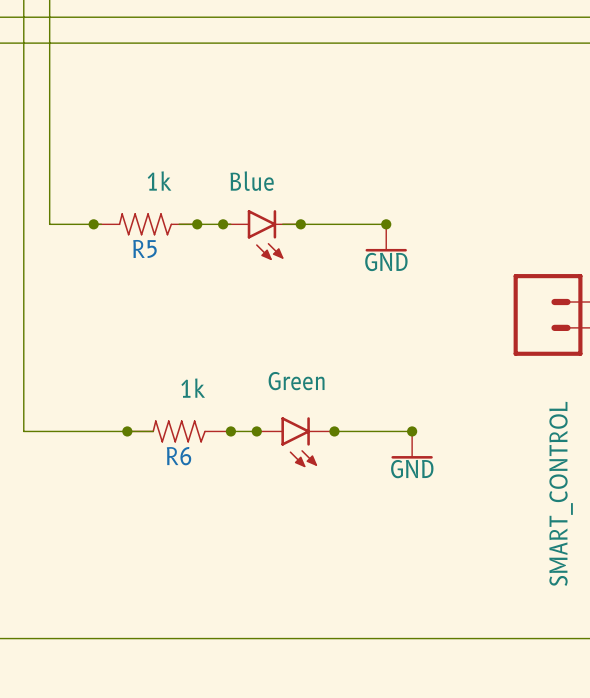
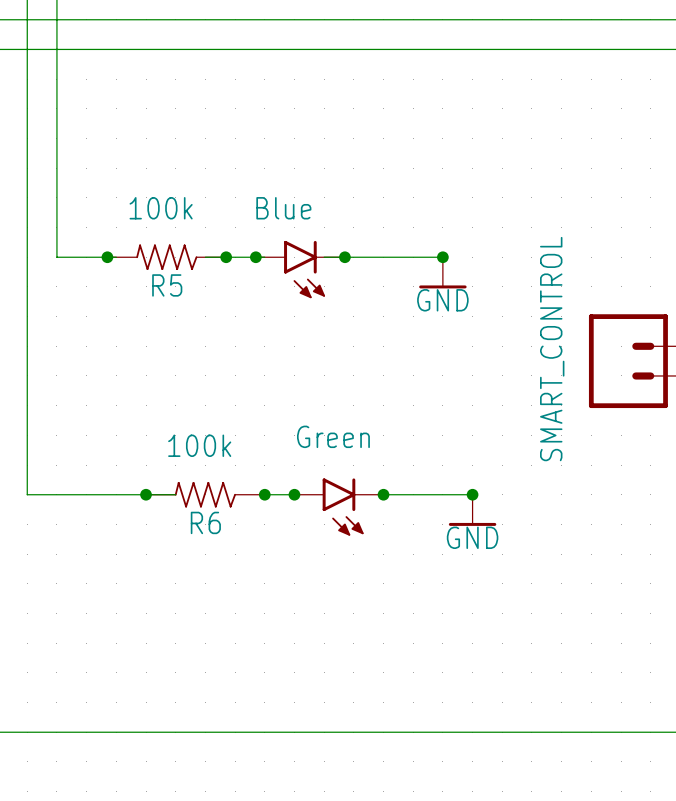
R5 text: 1k (159, 181) -> 100k (161, 208)
R6 text: 1k (193, 388) -> 100k (199, 445)
part text position: SMART_CONTROL (561, 493) -> SMART_CONTROL (552, 349)

